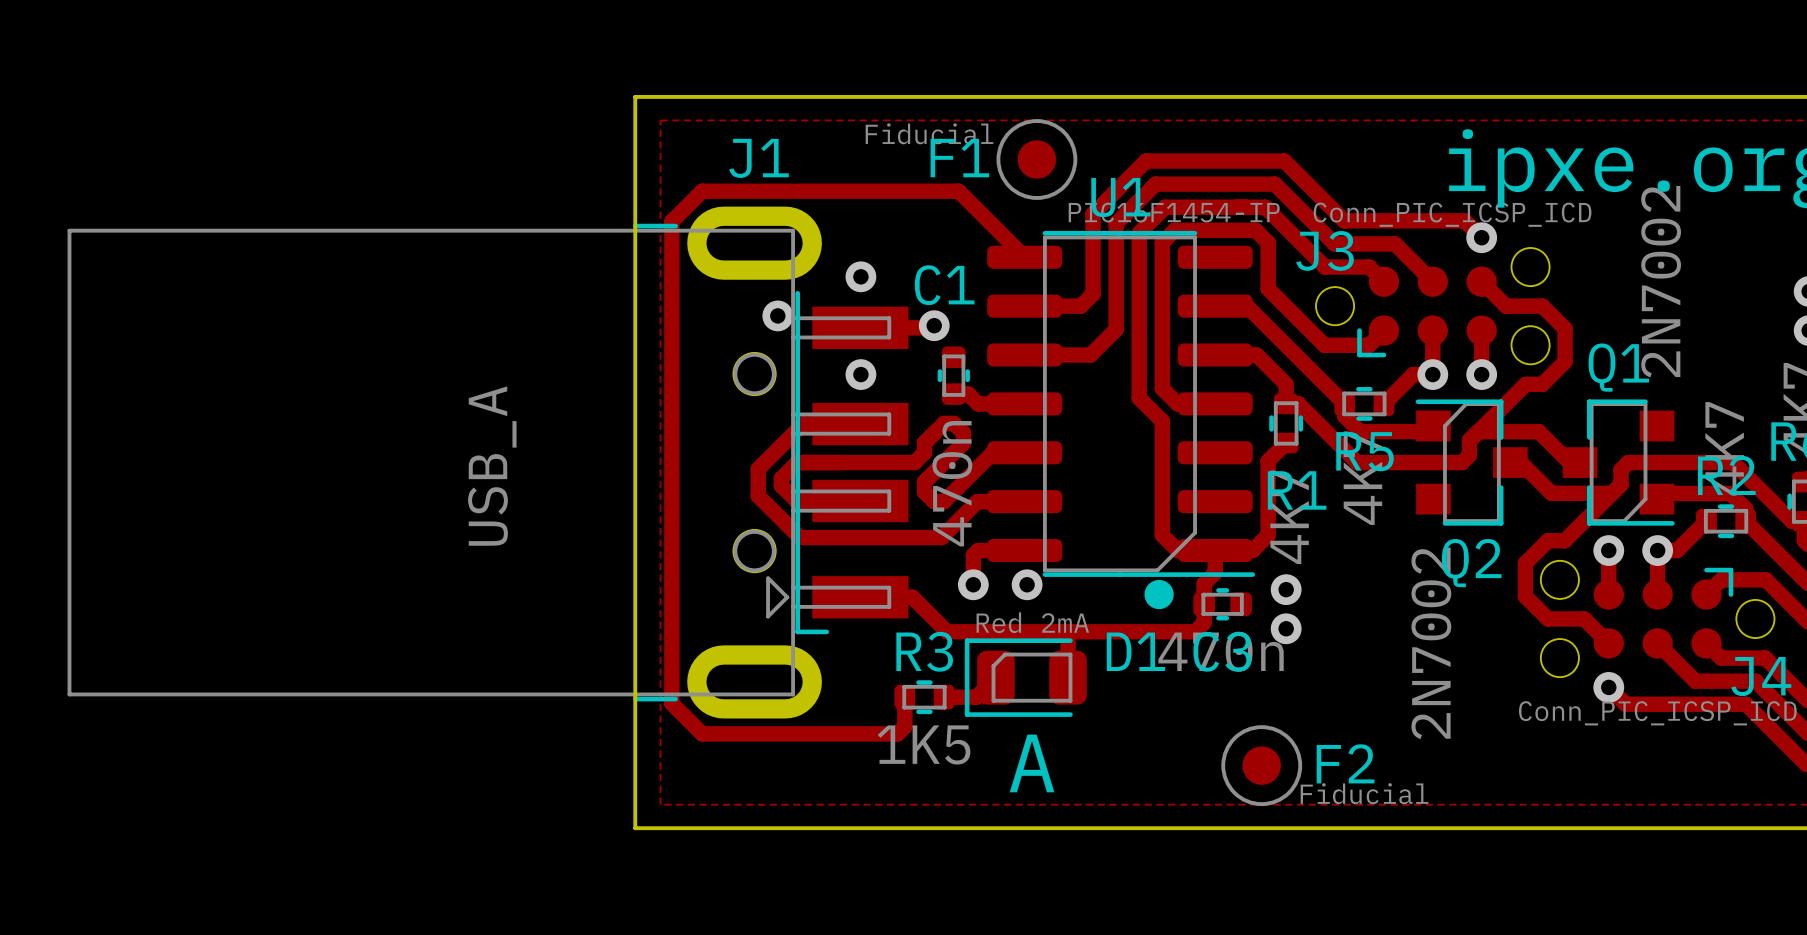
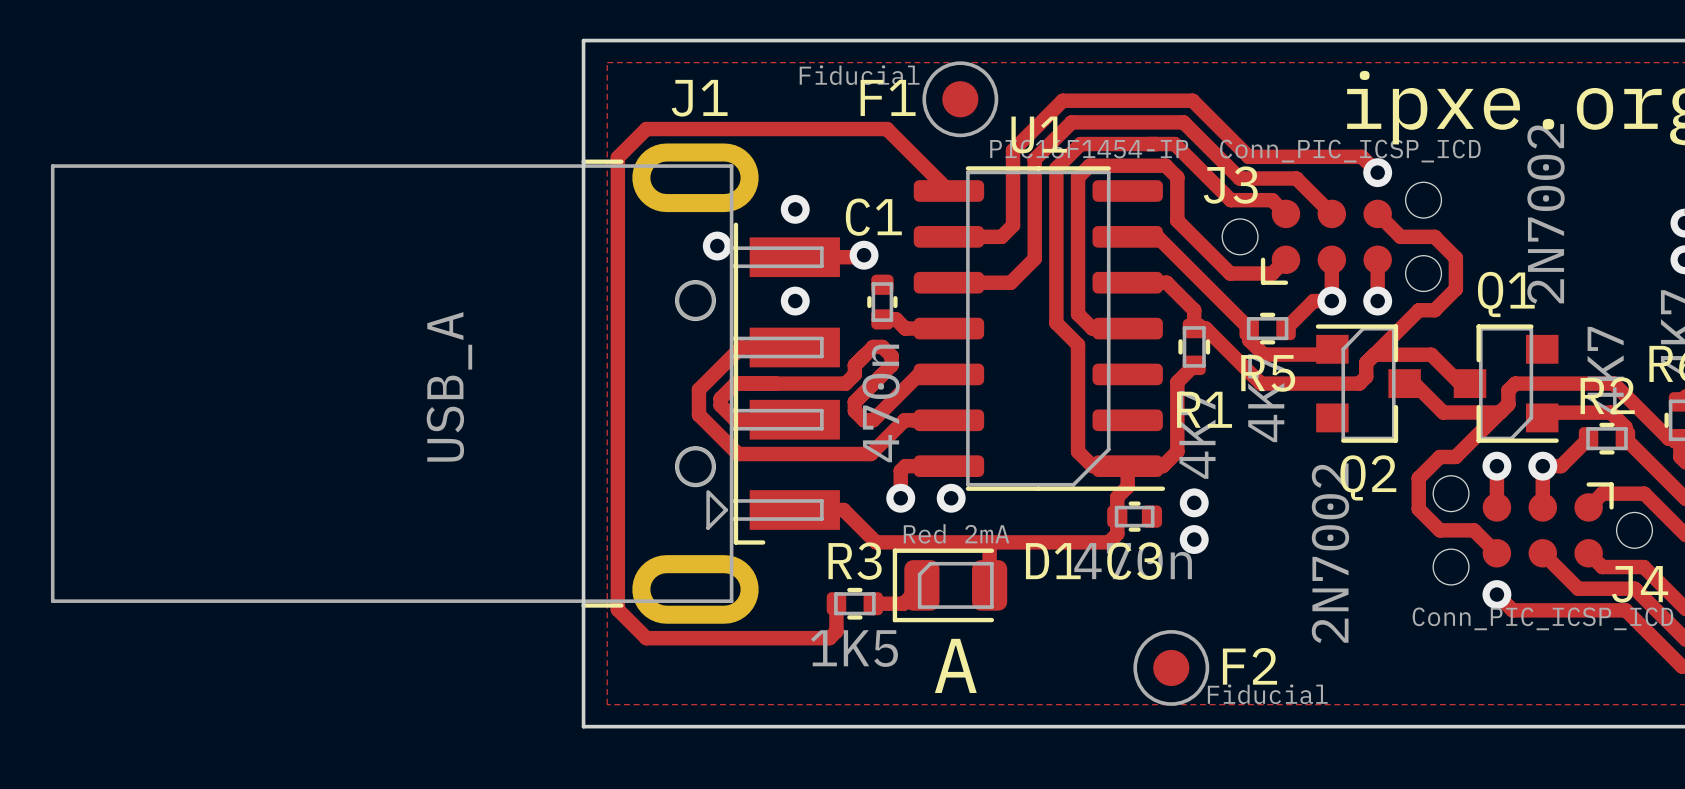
drawing: [1144, 579, 1174, 610] -> none

